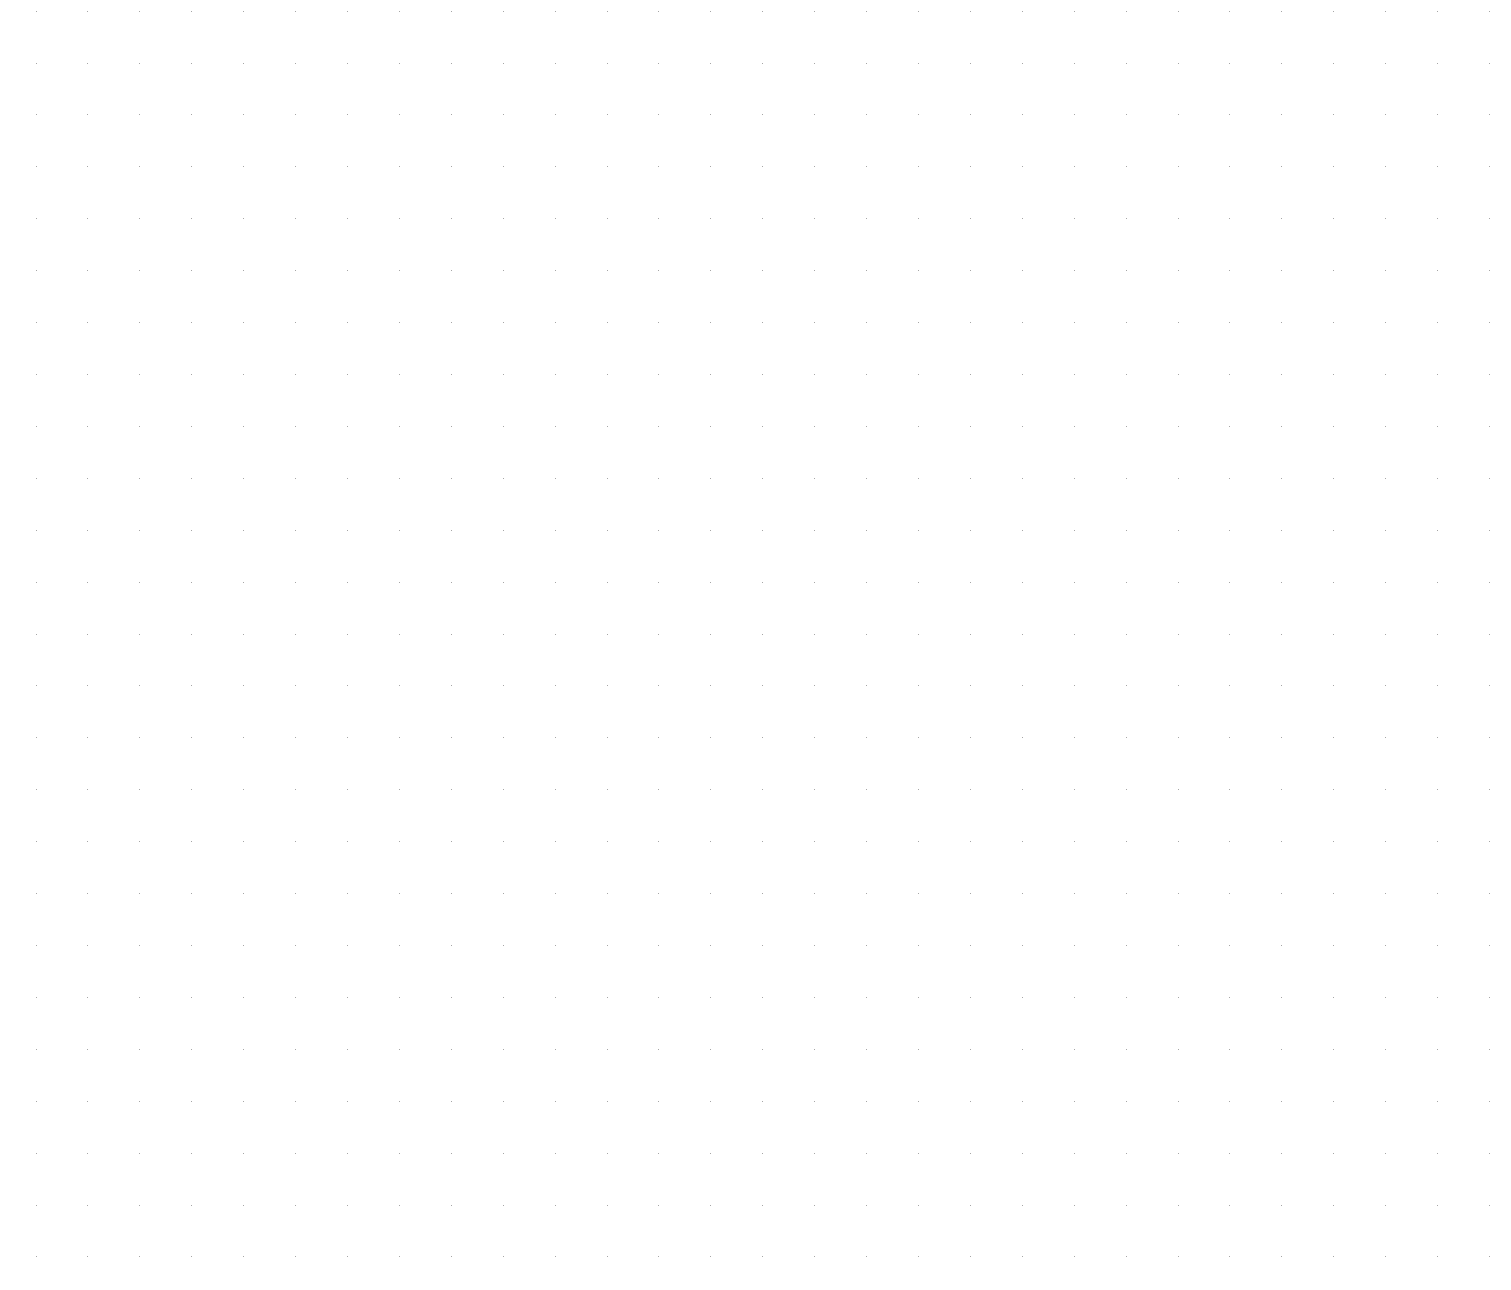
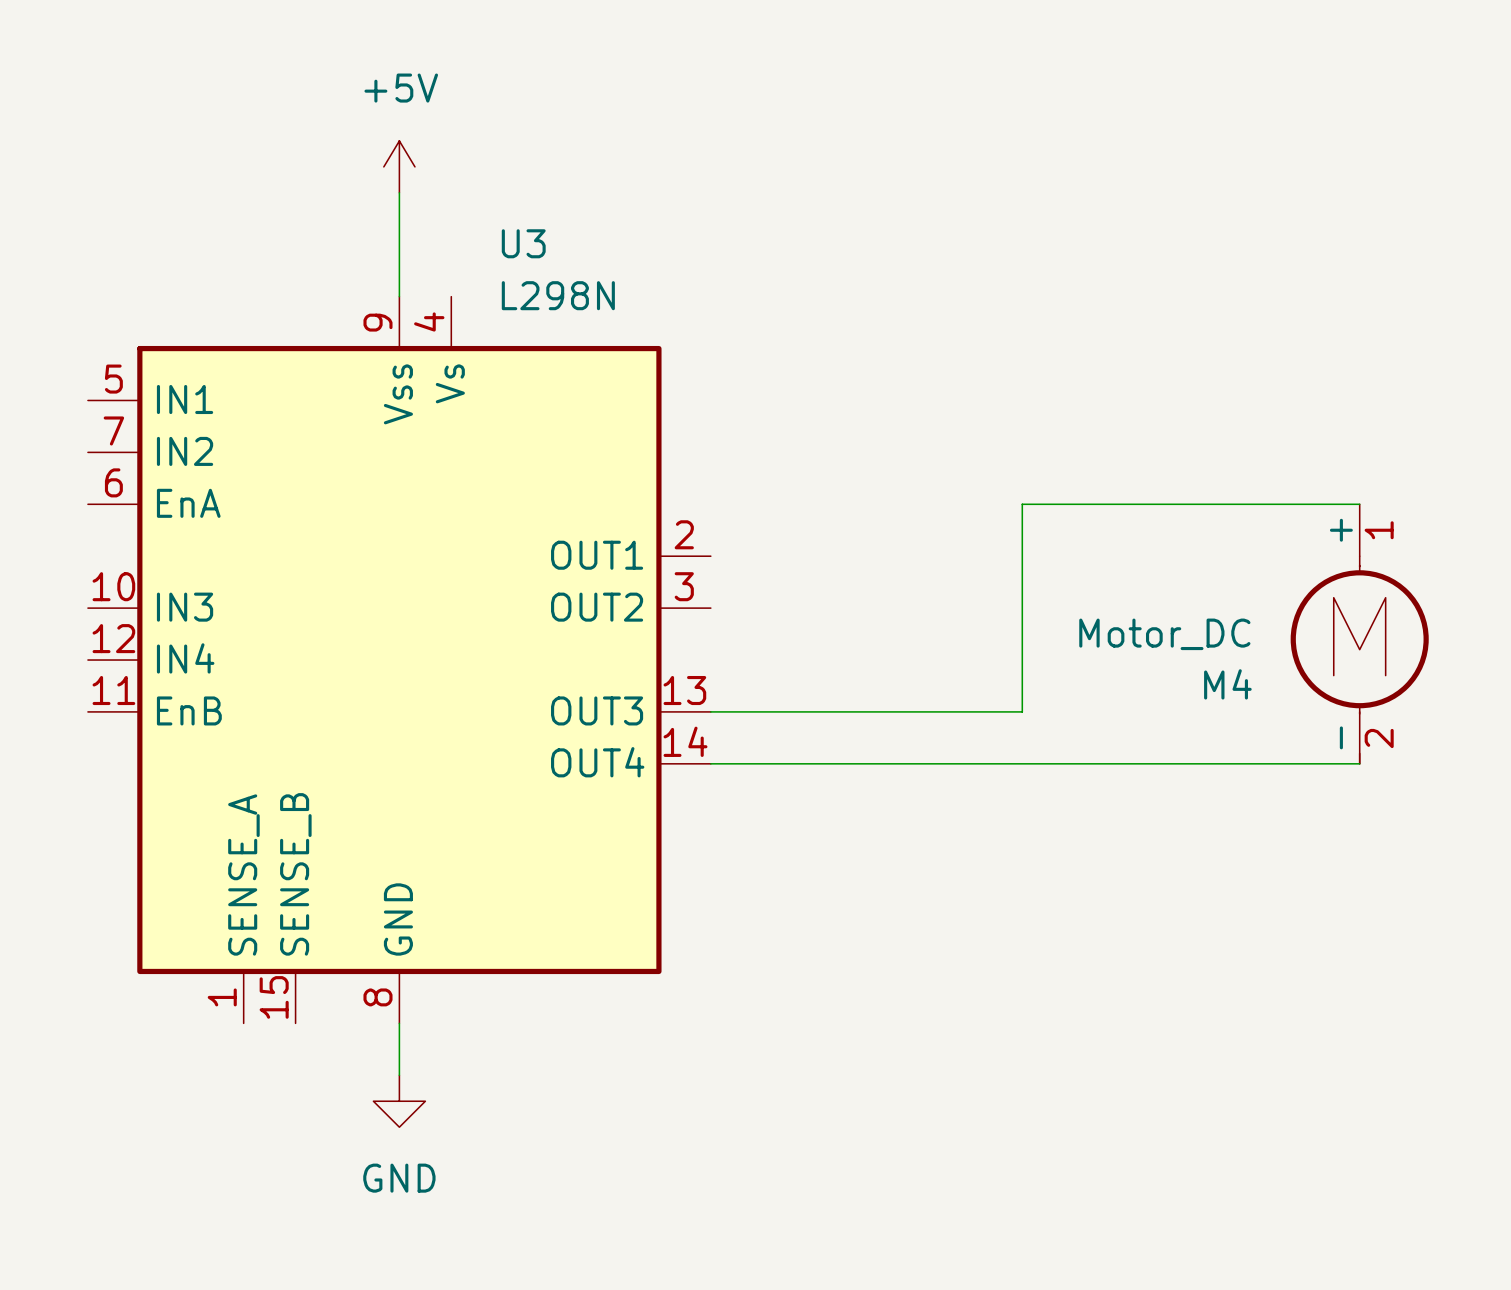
power symbol: none -> +5V (399, 166)
wire: none -> (399, 192) (399, 296)
wire: none -> (1359, 504) (1022, 504) (1022, 711) (710, 711)
M4: none -> Motor_DC (1359, 634)
U3: none -> L298N (399, 660)
wire: none -> (710, 763) (1359, 763)
wire: none -> (399, 1023) (399, 1075)
power symbol: none -> GND (399, 1101)

